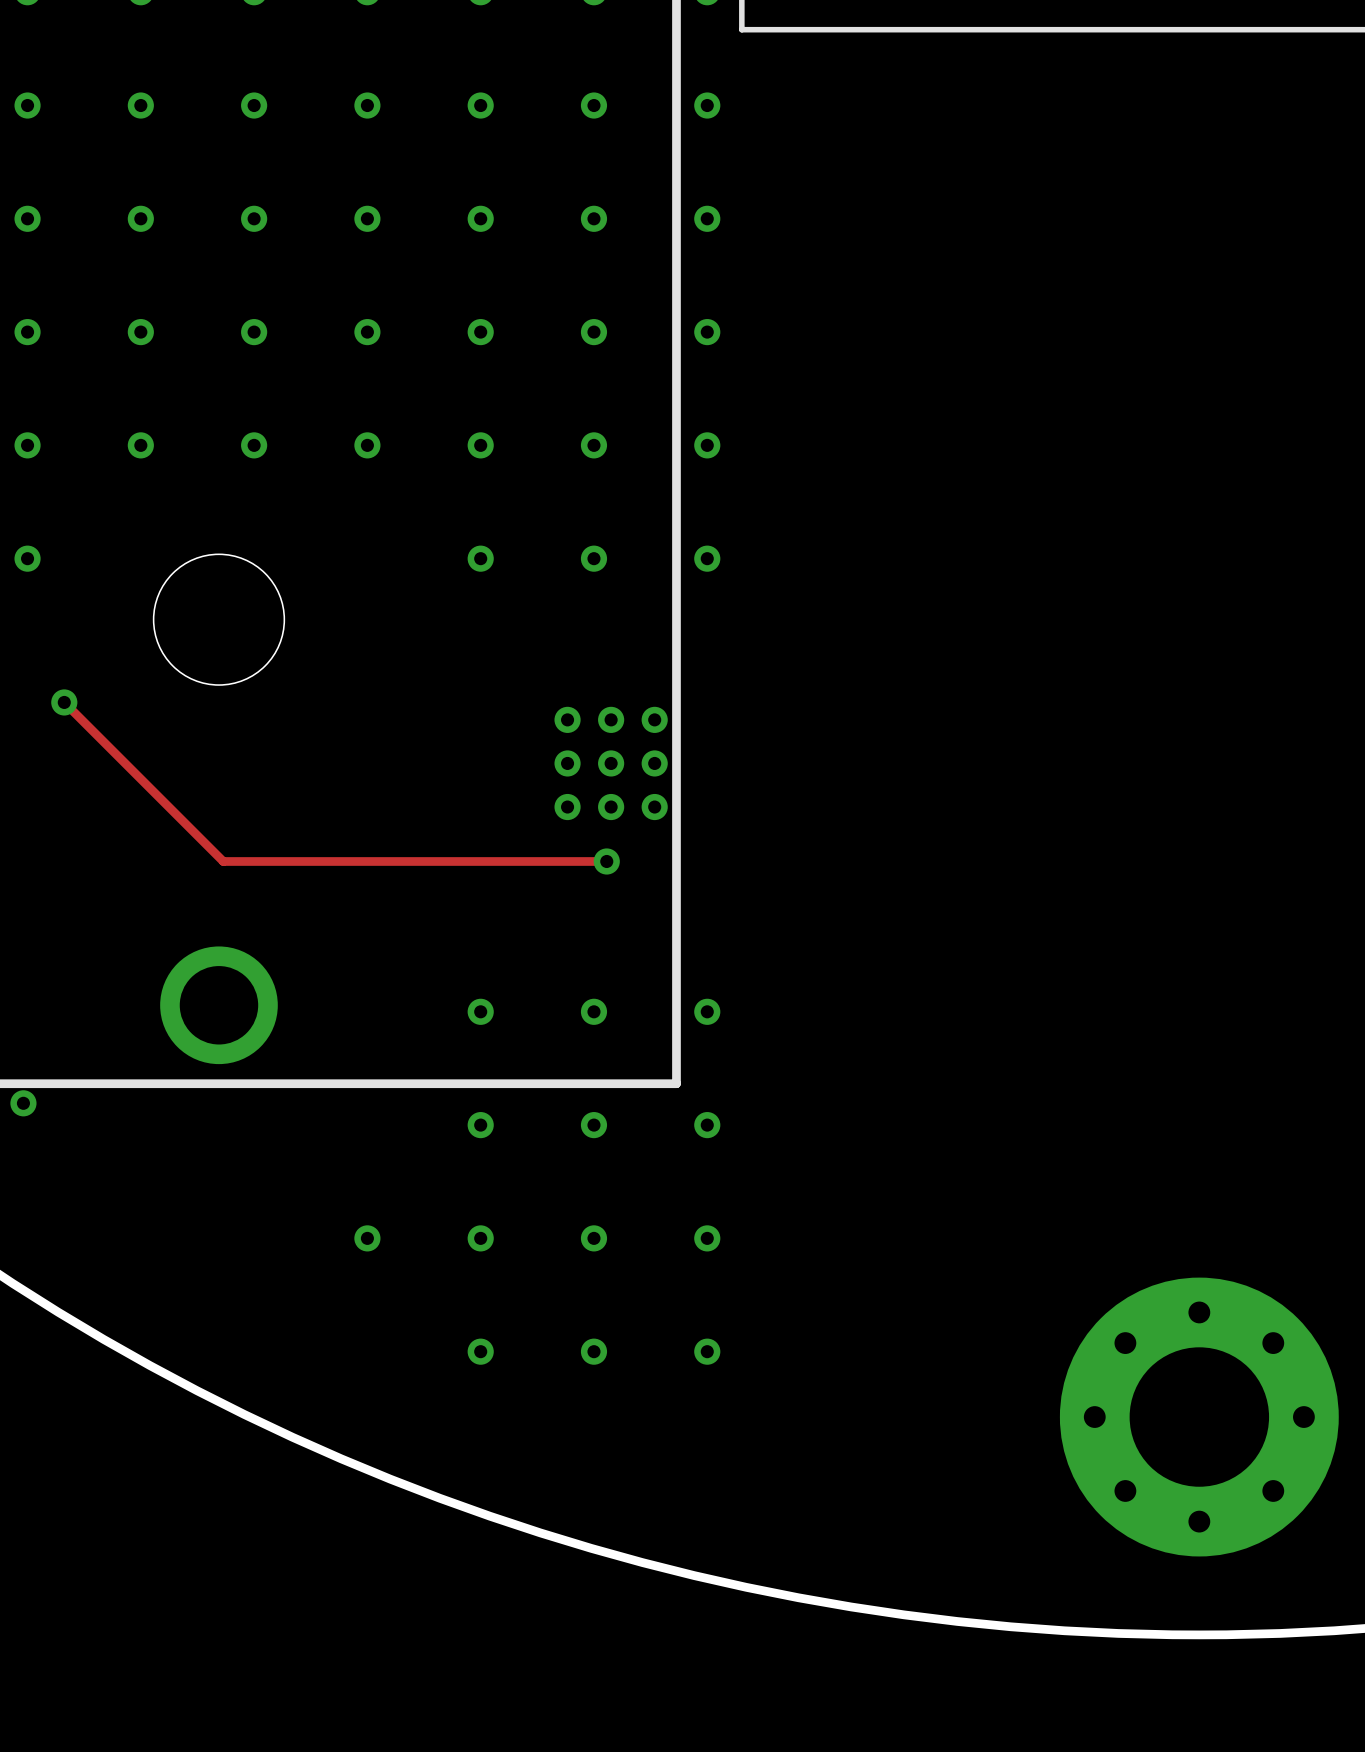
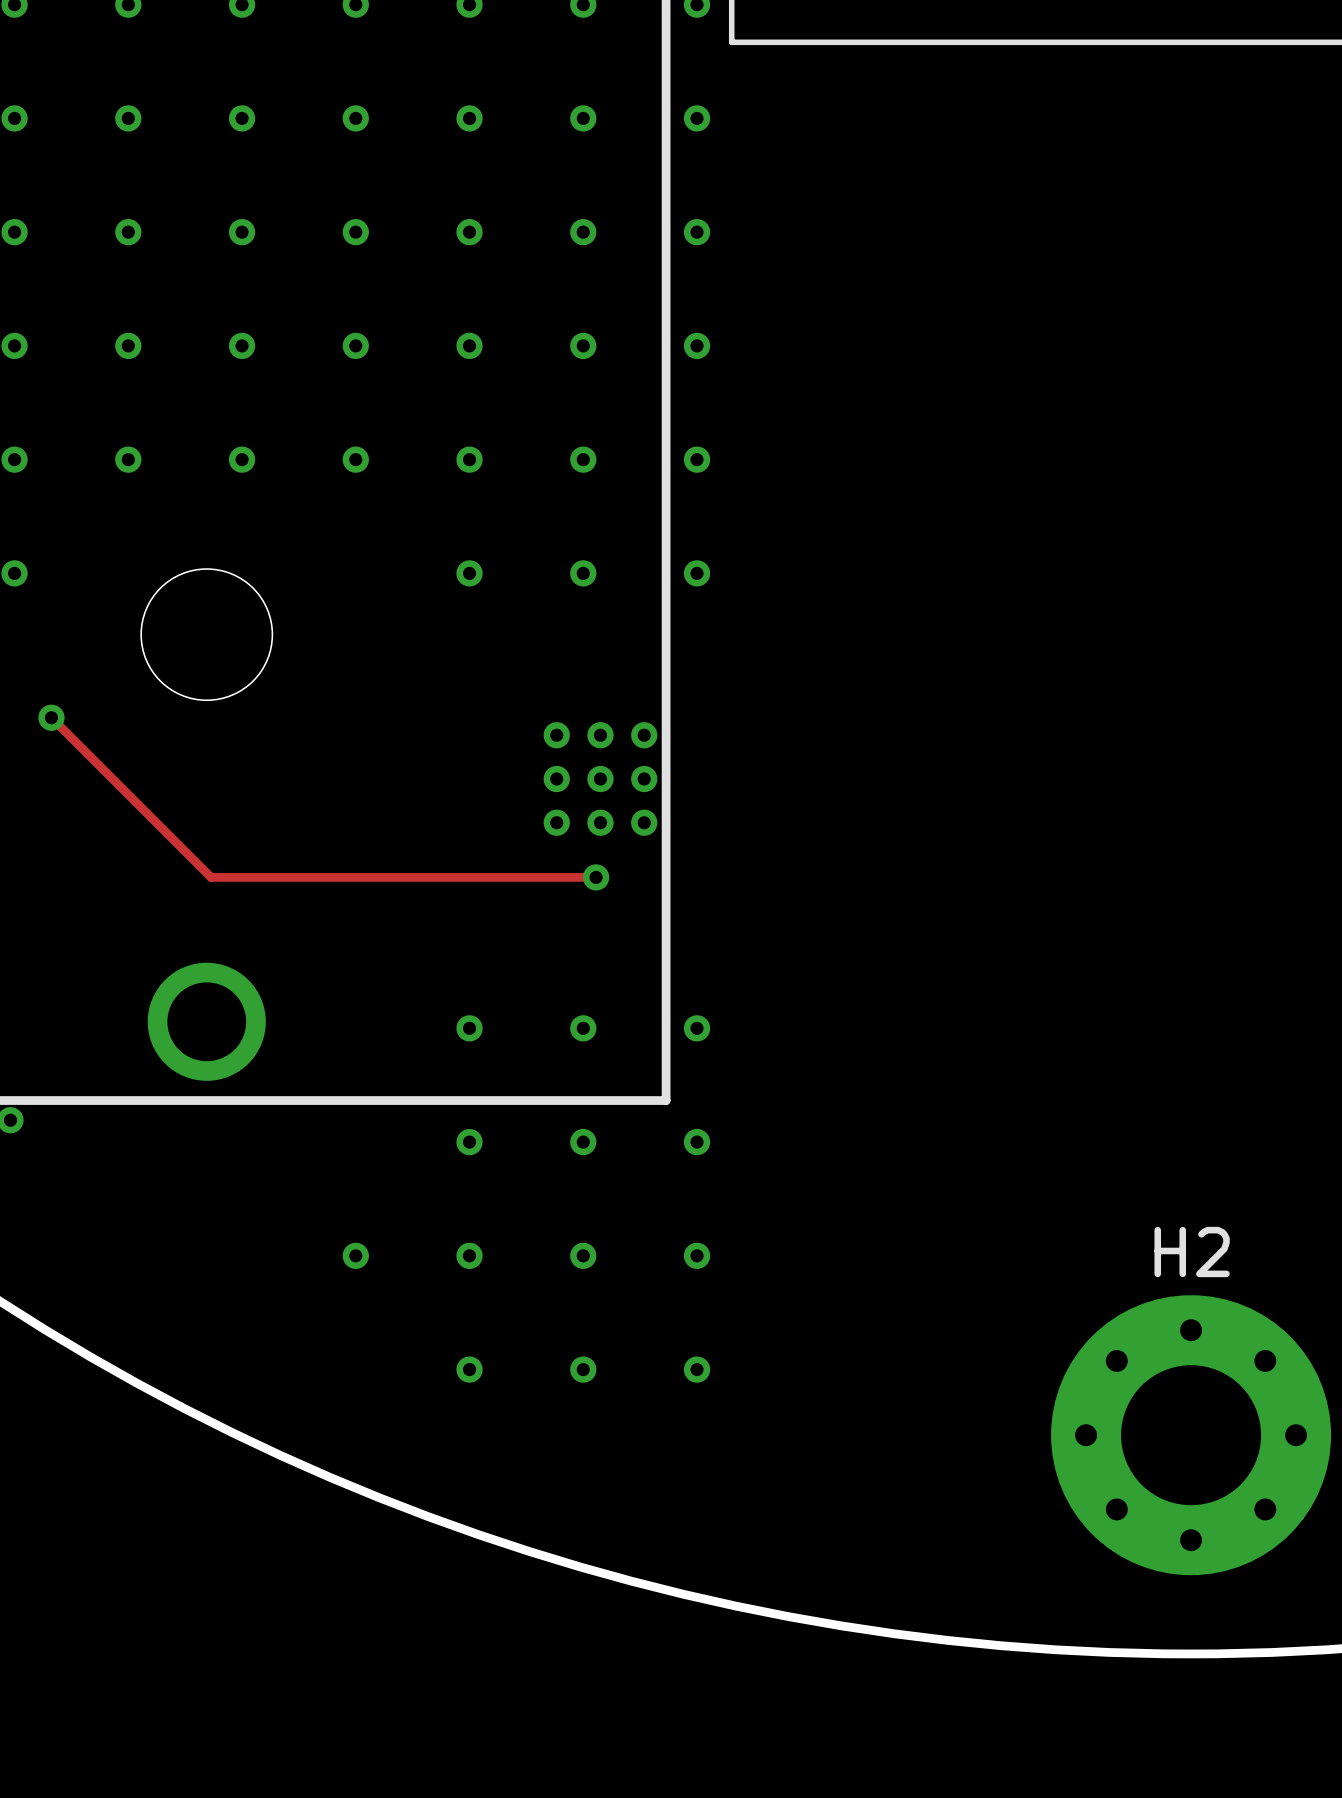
H2 name: none -> H2 (1192, 1252)

